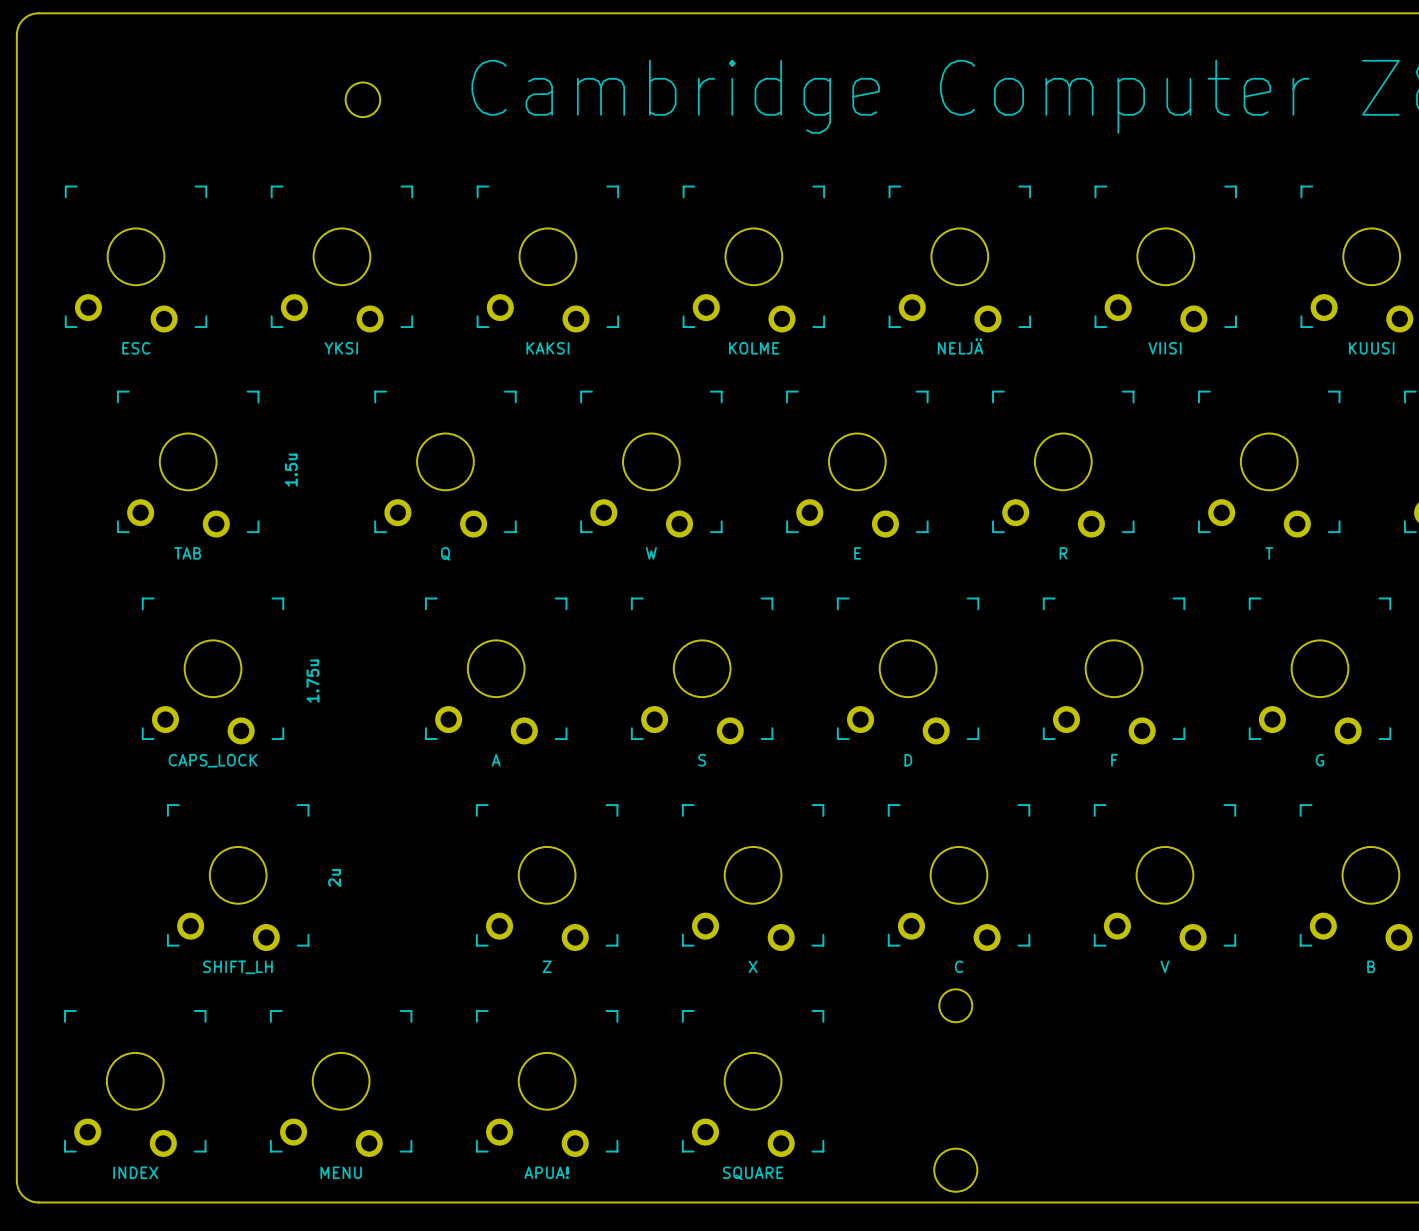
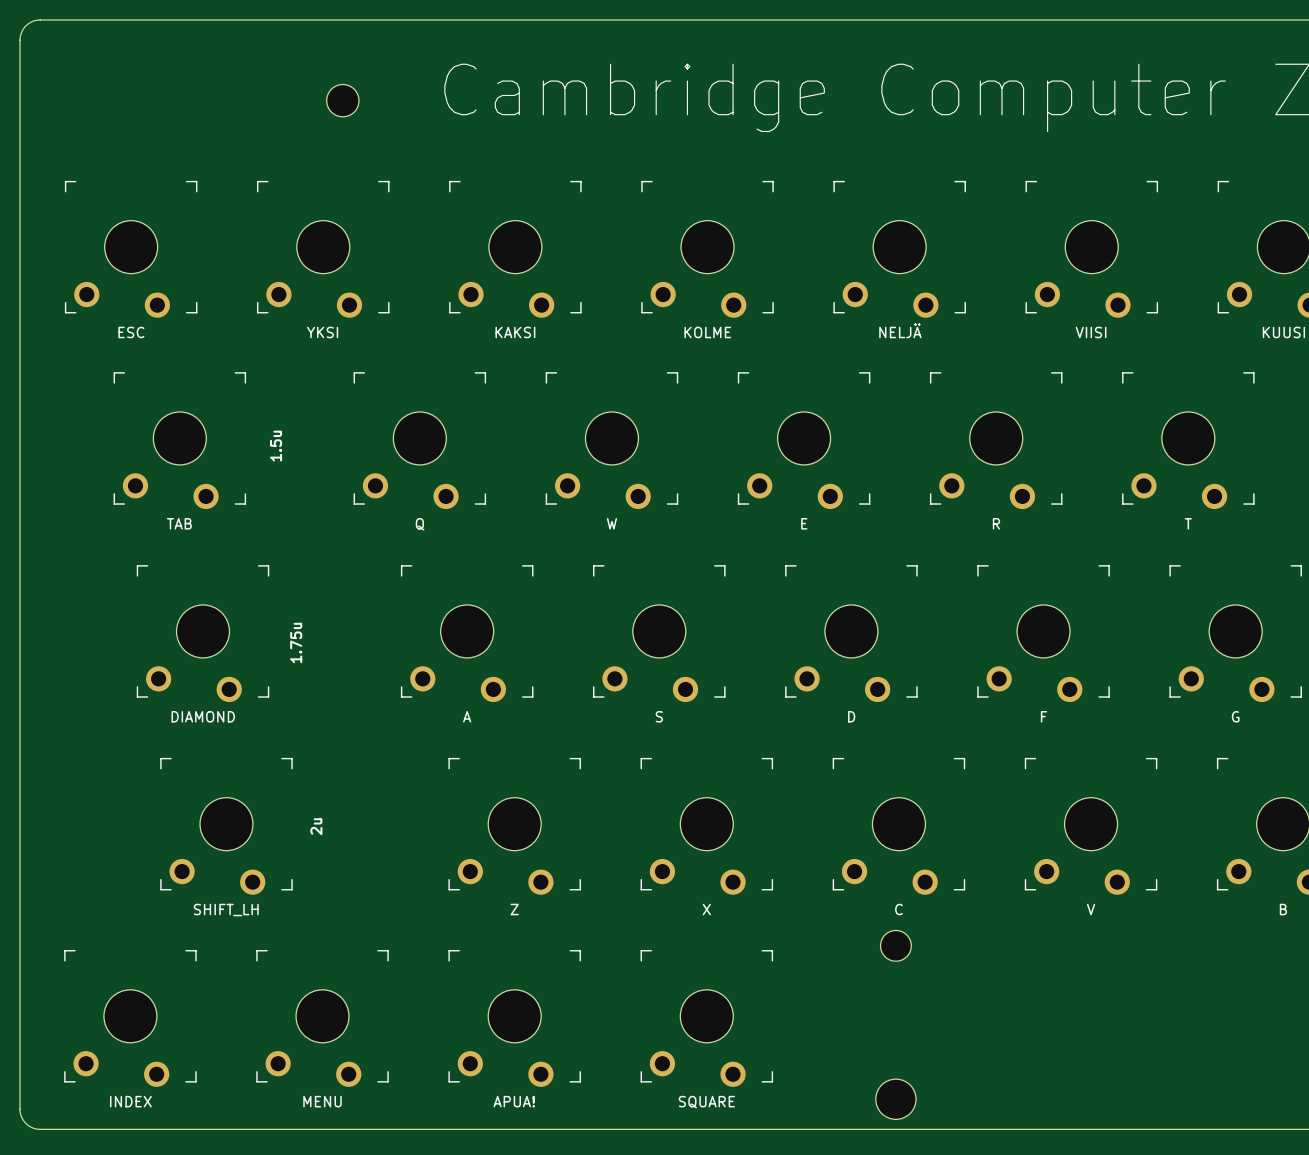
part value: CAPS_LOCK (213, 760) -> DIAMOND (203, 716)

